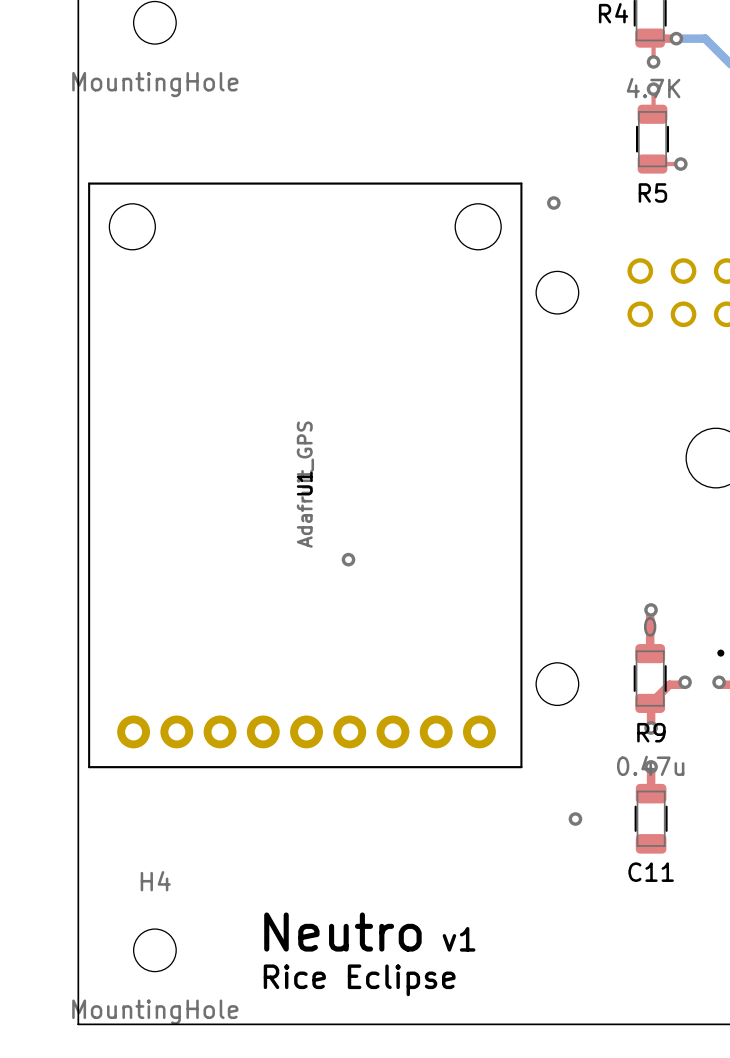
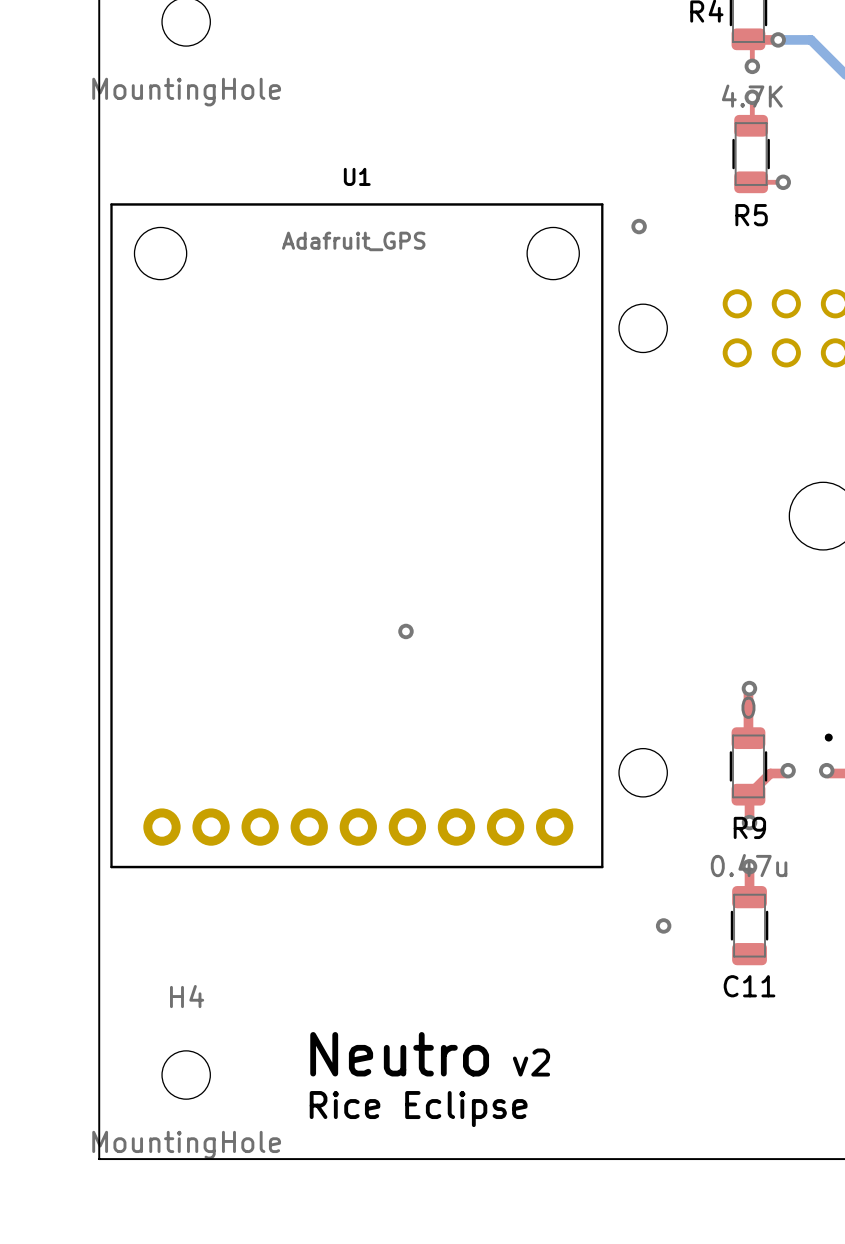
U1 name rotation: 0° (304, 483) -> 90° clockwise (357, 176)
U1 name position: U1 (304, 483) -> U1 (357, 176)
U1 value rotation: 0° (305, 484) -> 90° clockwise (353, 241)
U1 value position: Adafruit_GPS (305, 484) -> Adafruit_GPS (353, 241)
text: v1 (459, 939) -> v2 (531, 1062)

